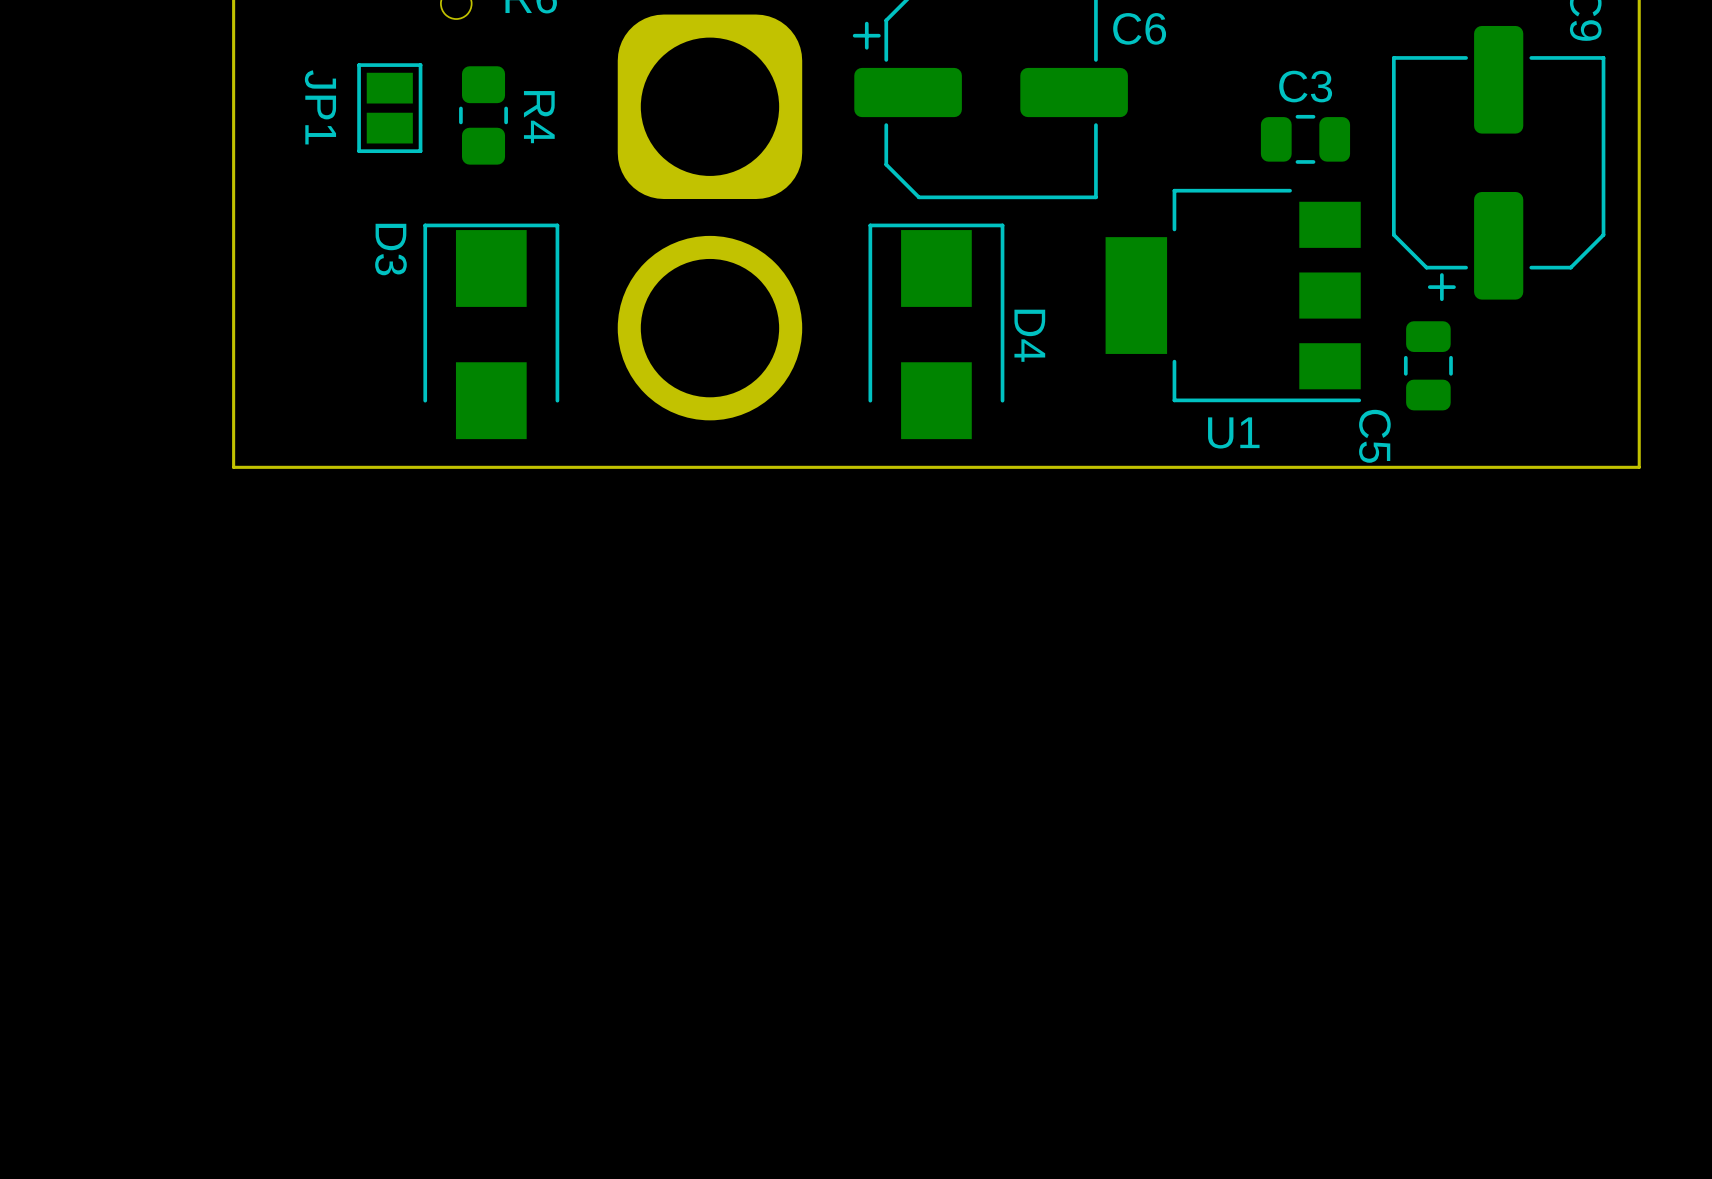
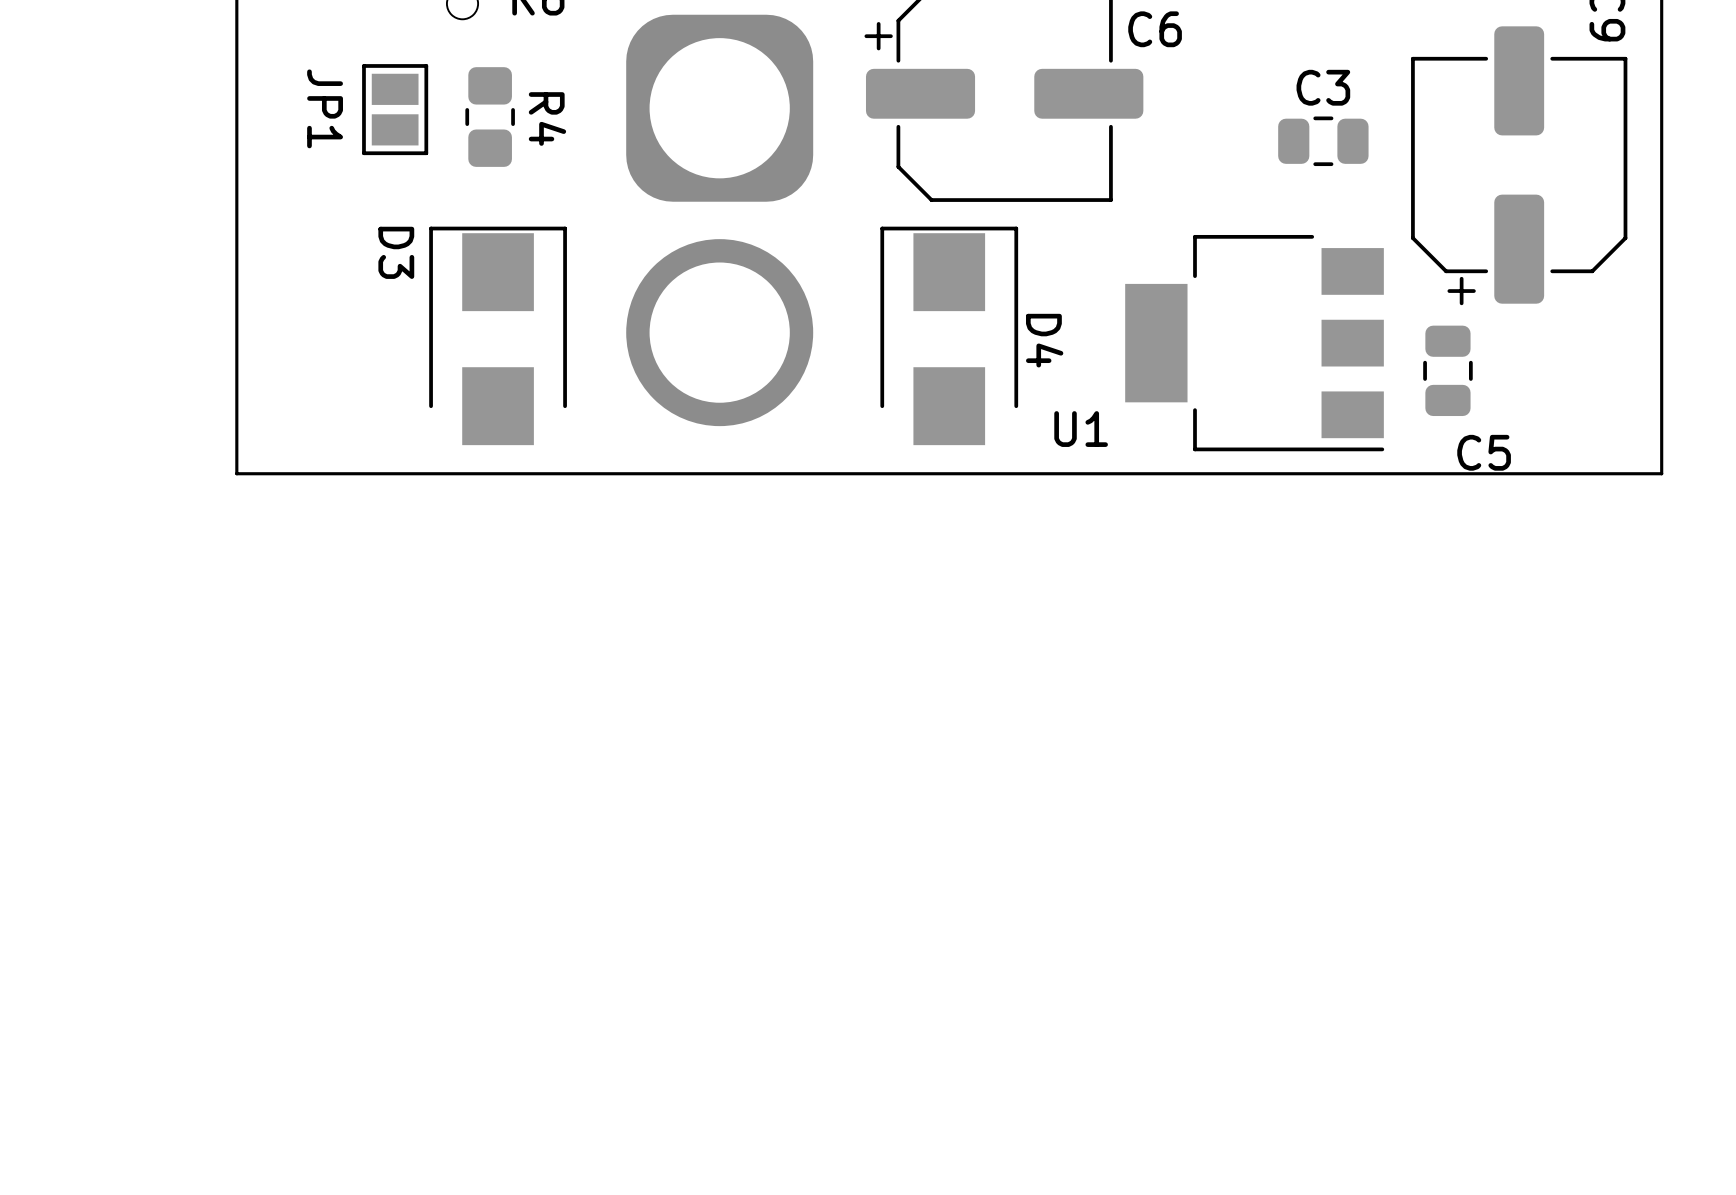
U1 position: (1233, 295) -> (1254, 343)
U1 name position: U1 (1233, 432) -> U1 (1081, 429)
C5 name rotation: 0° (1374, 436) -> 90° counterclockwise (1484, 452)
C5 name position: C5 (1374, 436) -> C5 (1484, 452)

